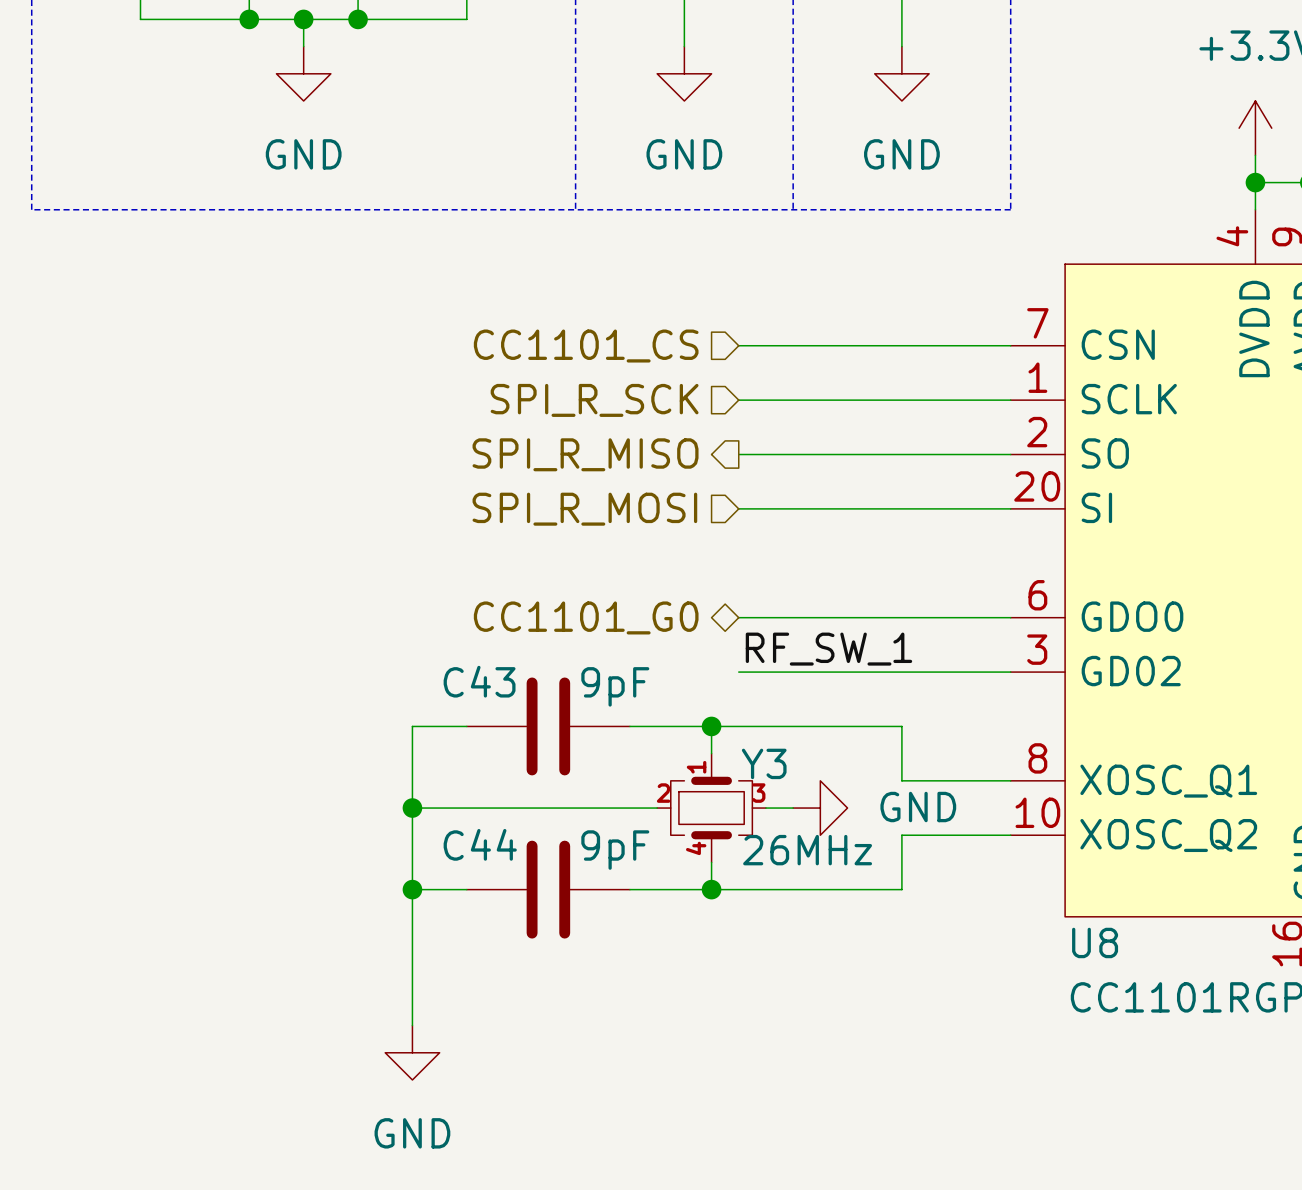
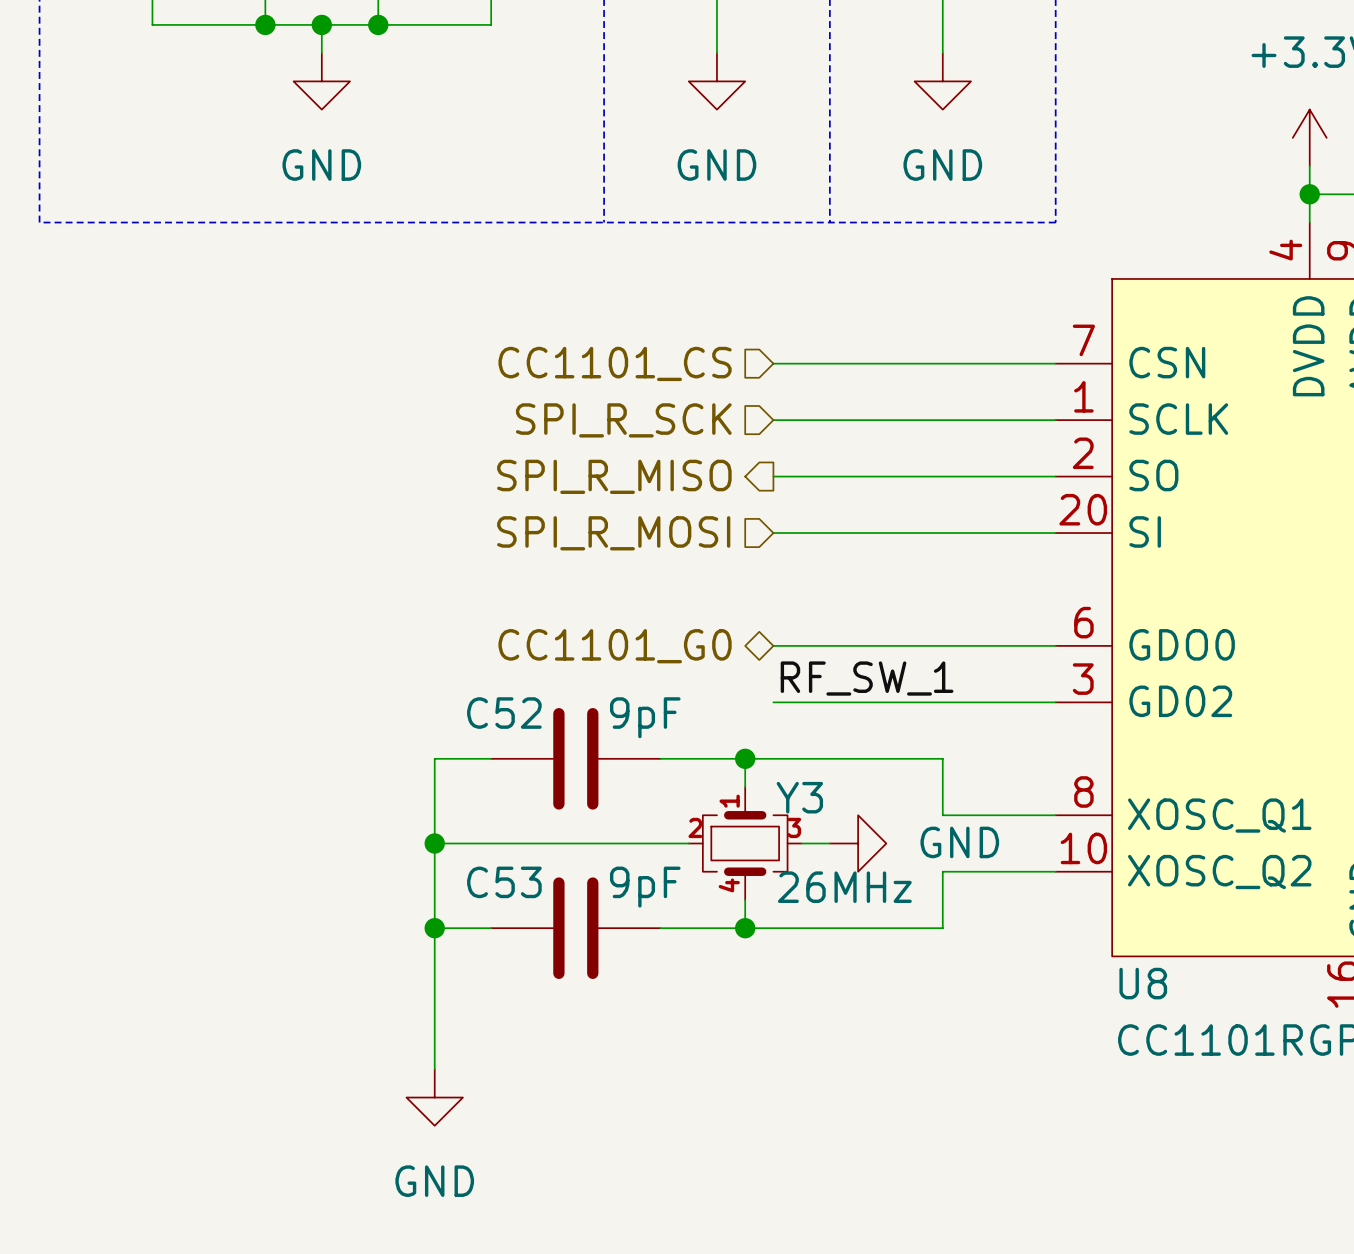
C43 name: C43 (479, 681) -> C52 (504, 713)
C44 name: C44 (480, 844) -> C53 (504, 882)

